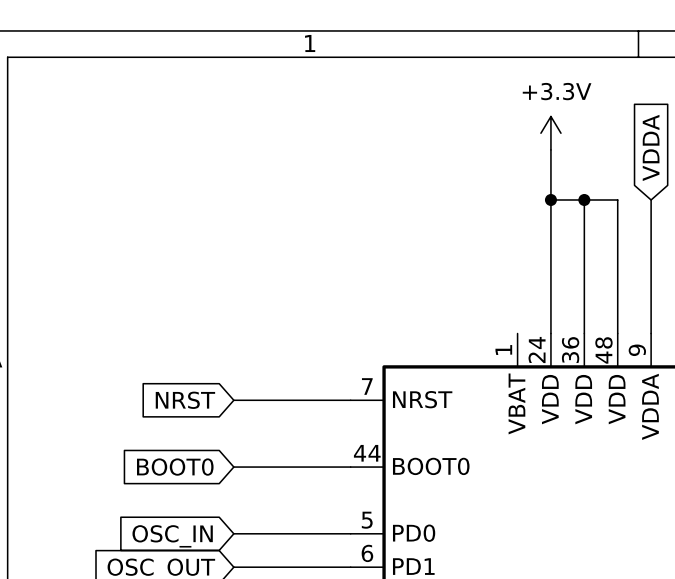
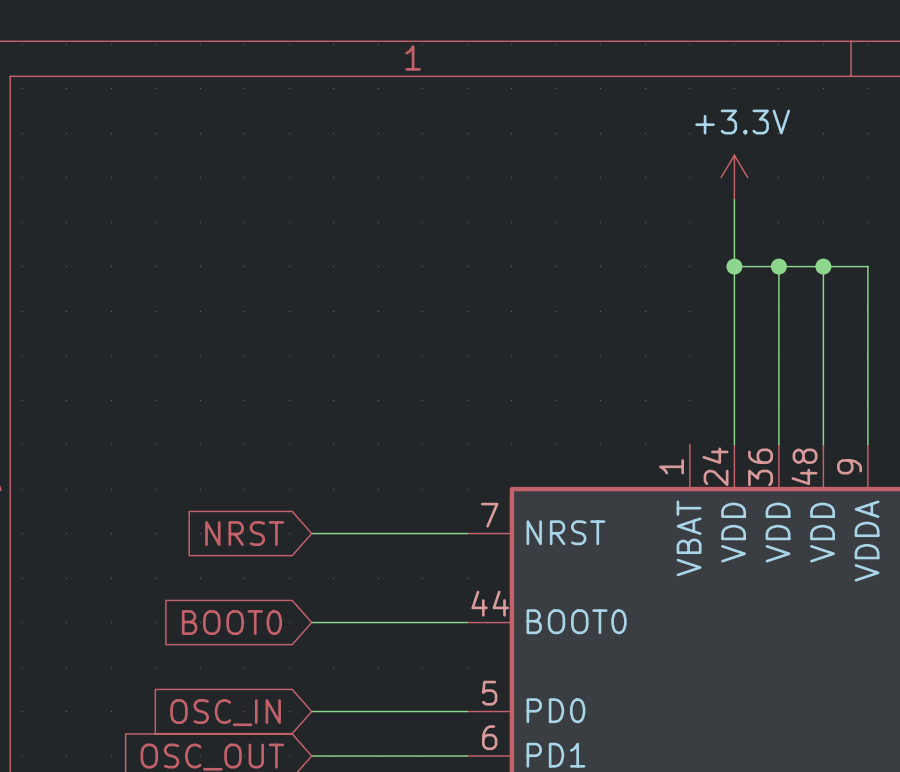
global label: VDDA (651, 147) -> none
wire: none -> (823, 266) (867, 266)
junction: none -> (823, 266)

